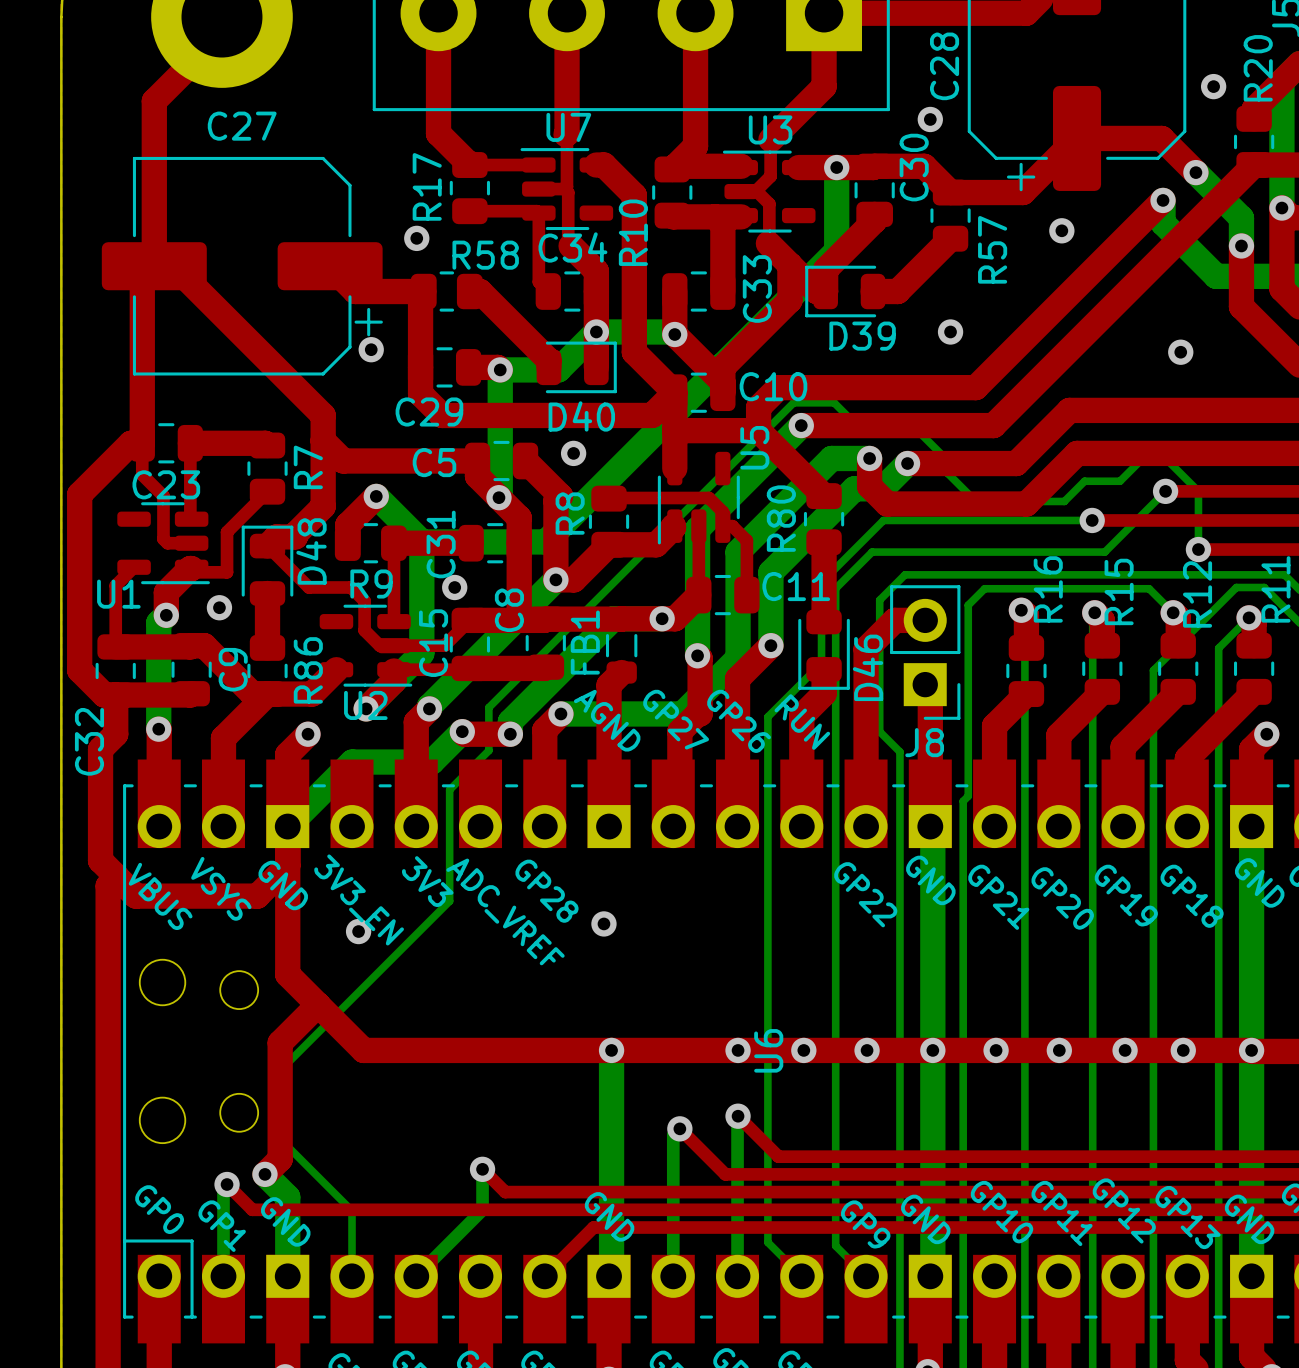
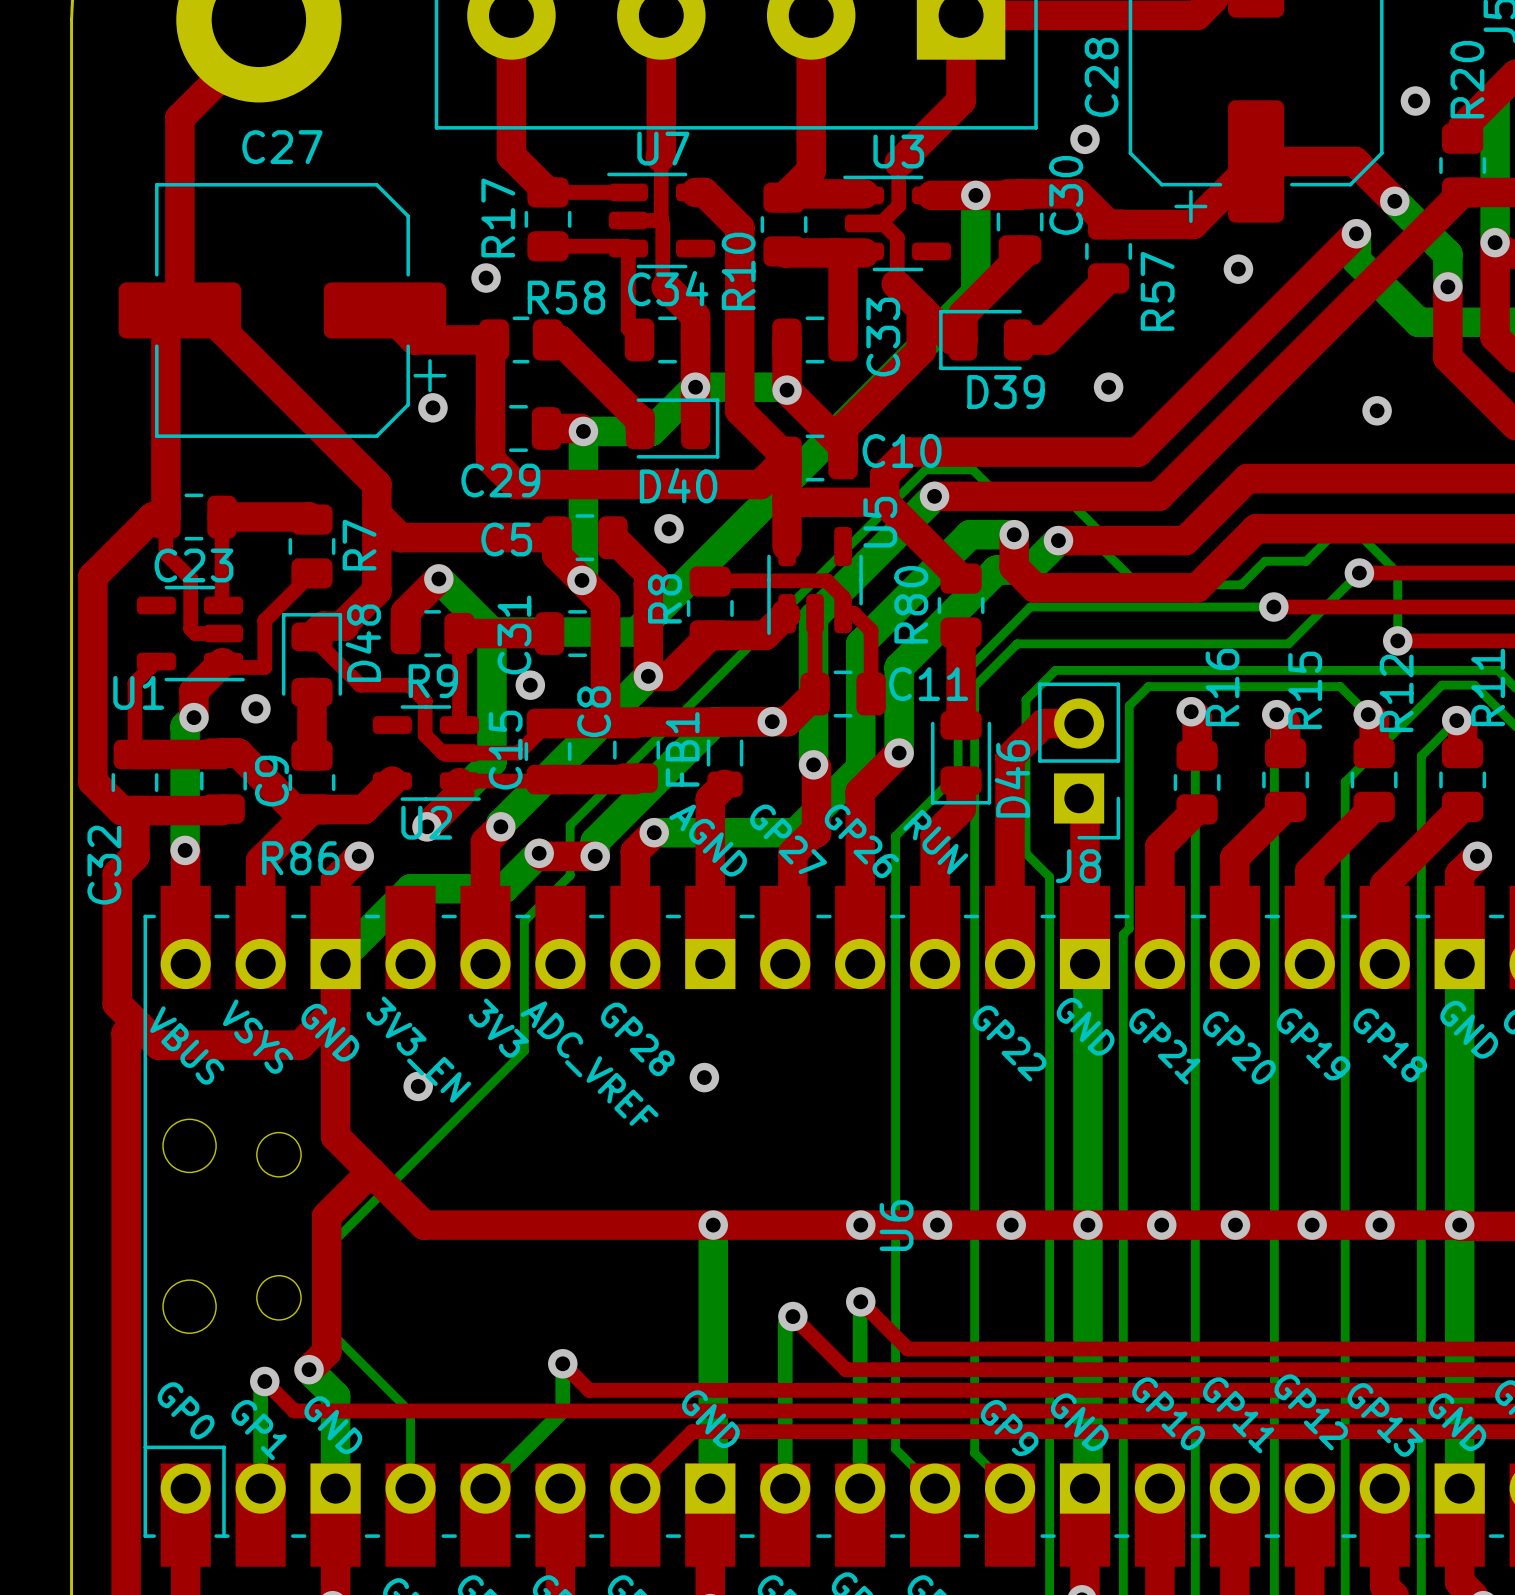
R86 name rotation: 0° (308, 670) -> 90° clockwise (300, 858)

